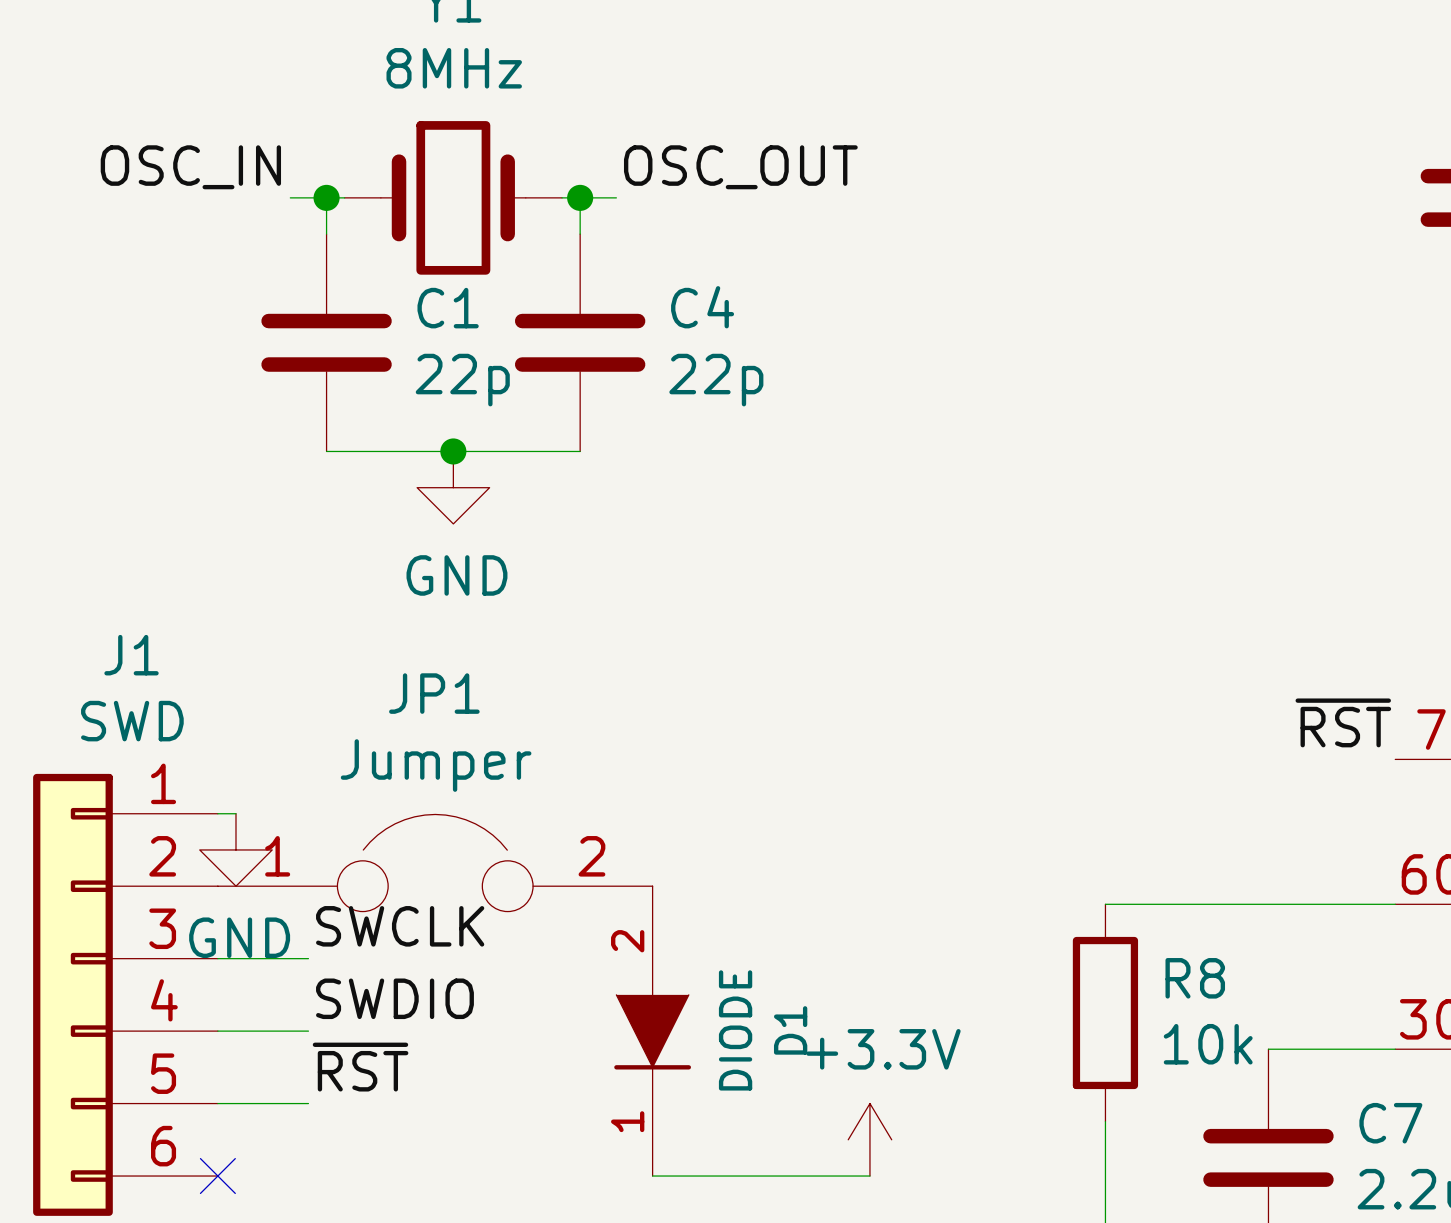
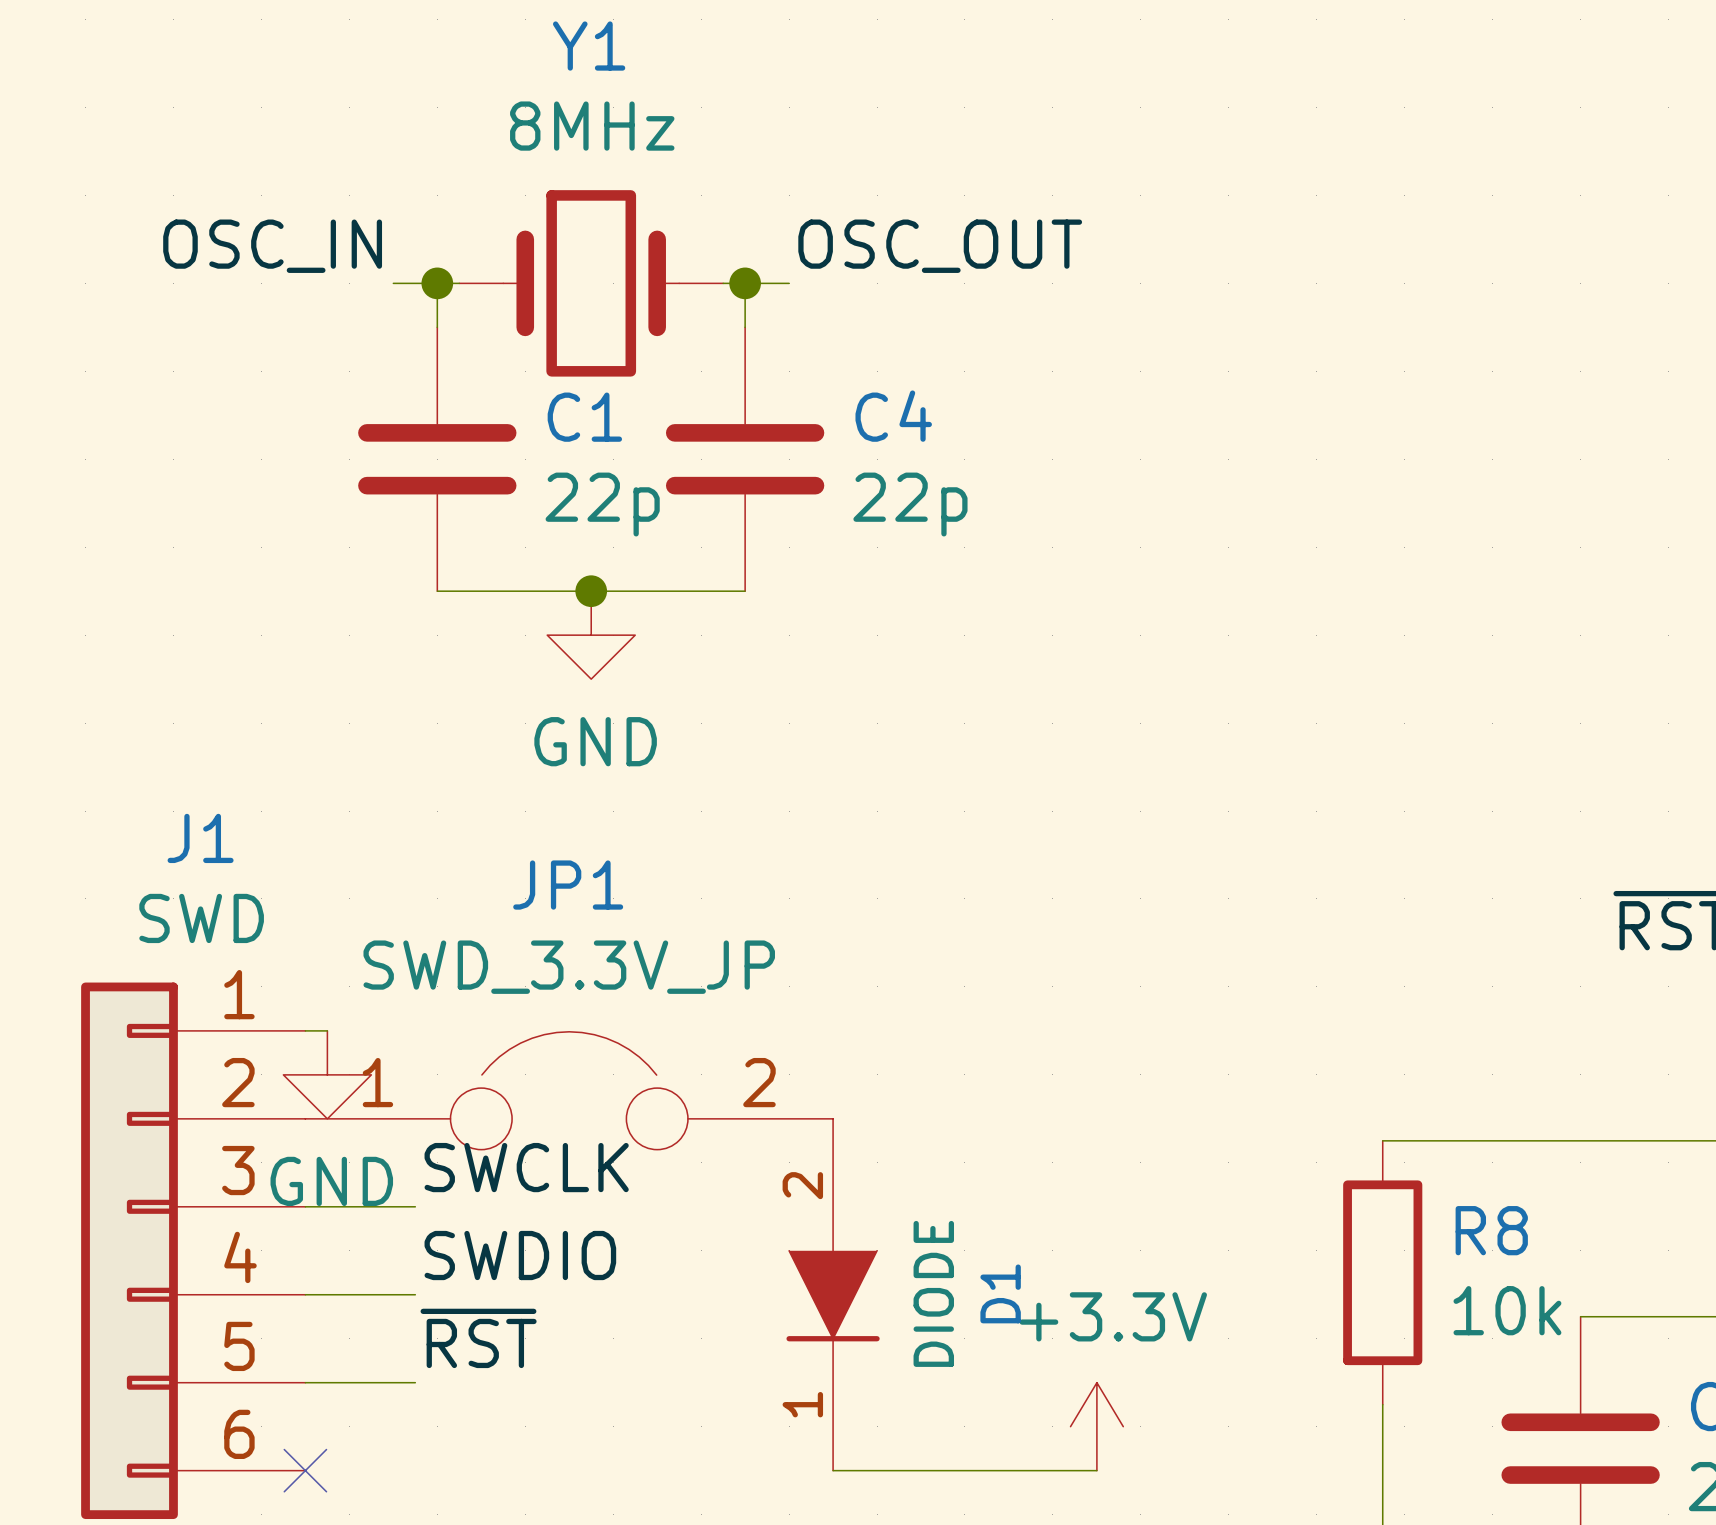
JP1 value: Jumper (436, 765) -> SWD_3.3V_JP (569, 967)

